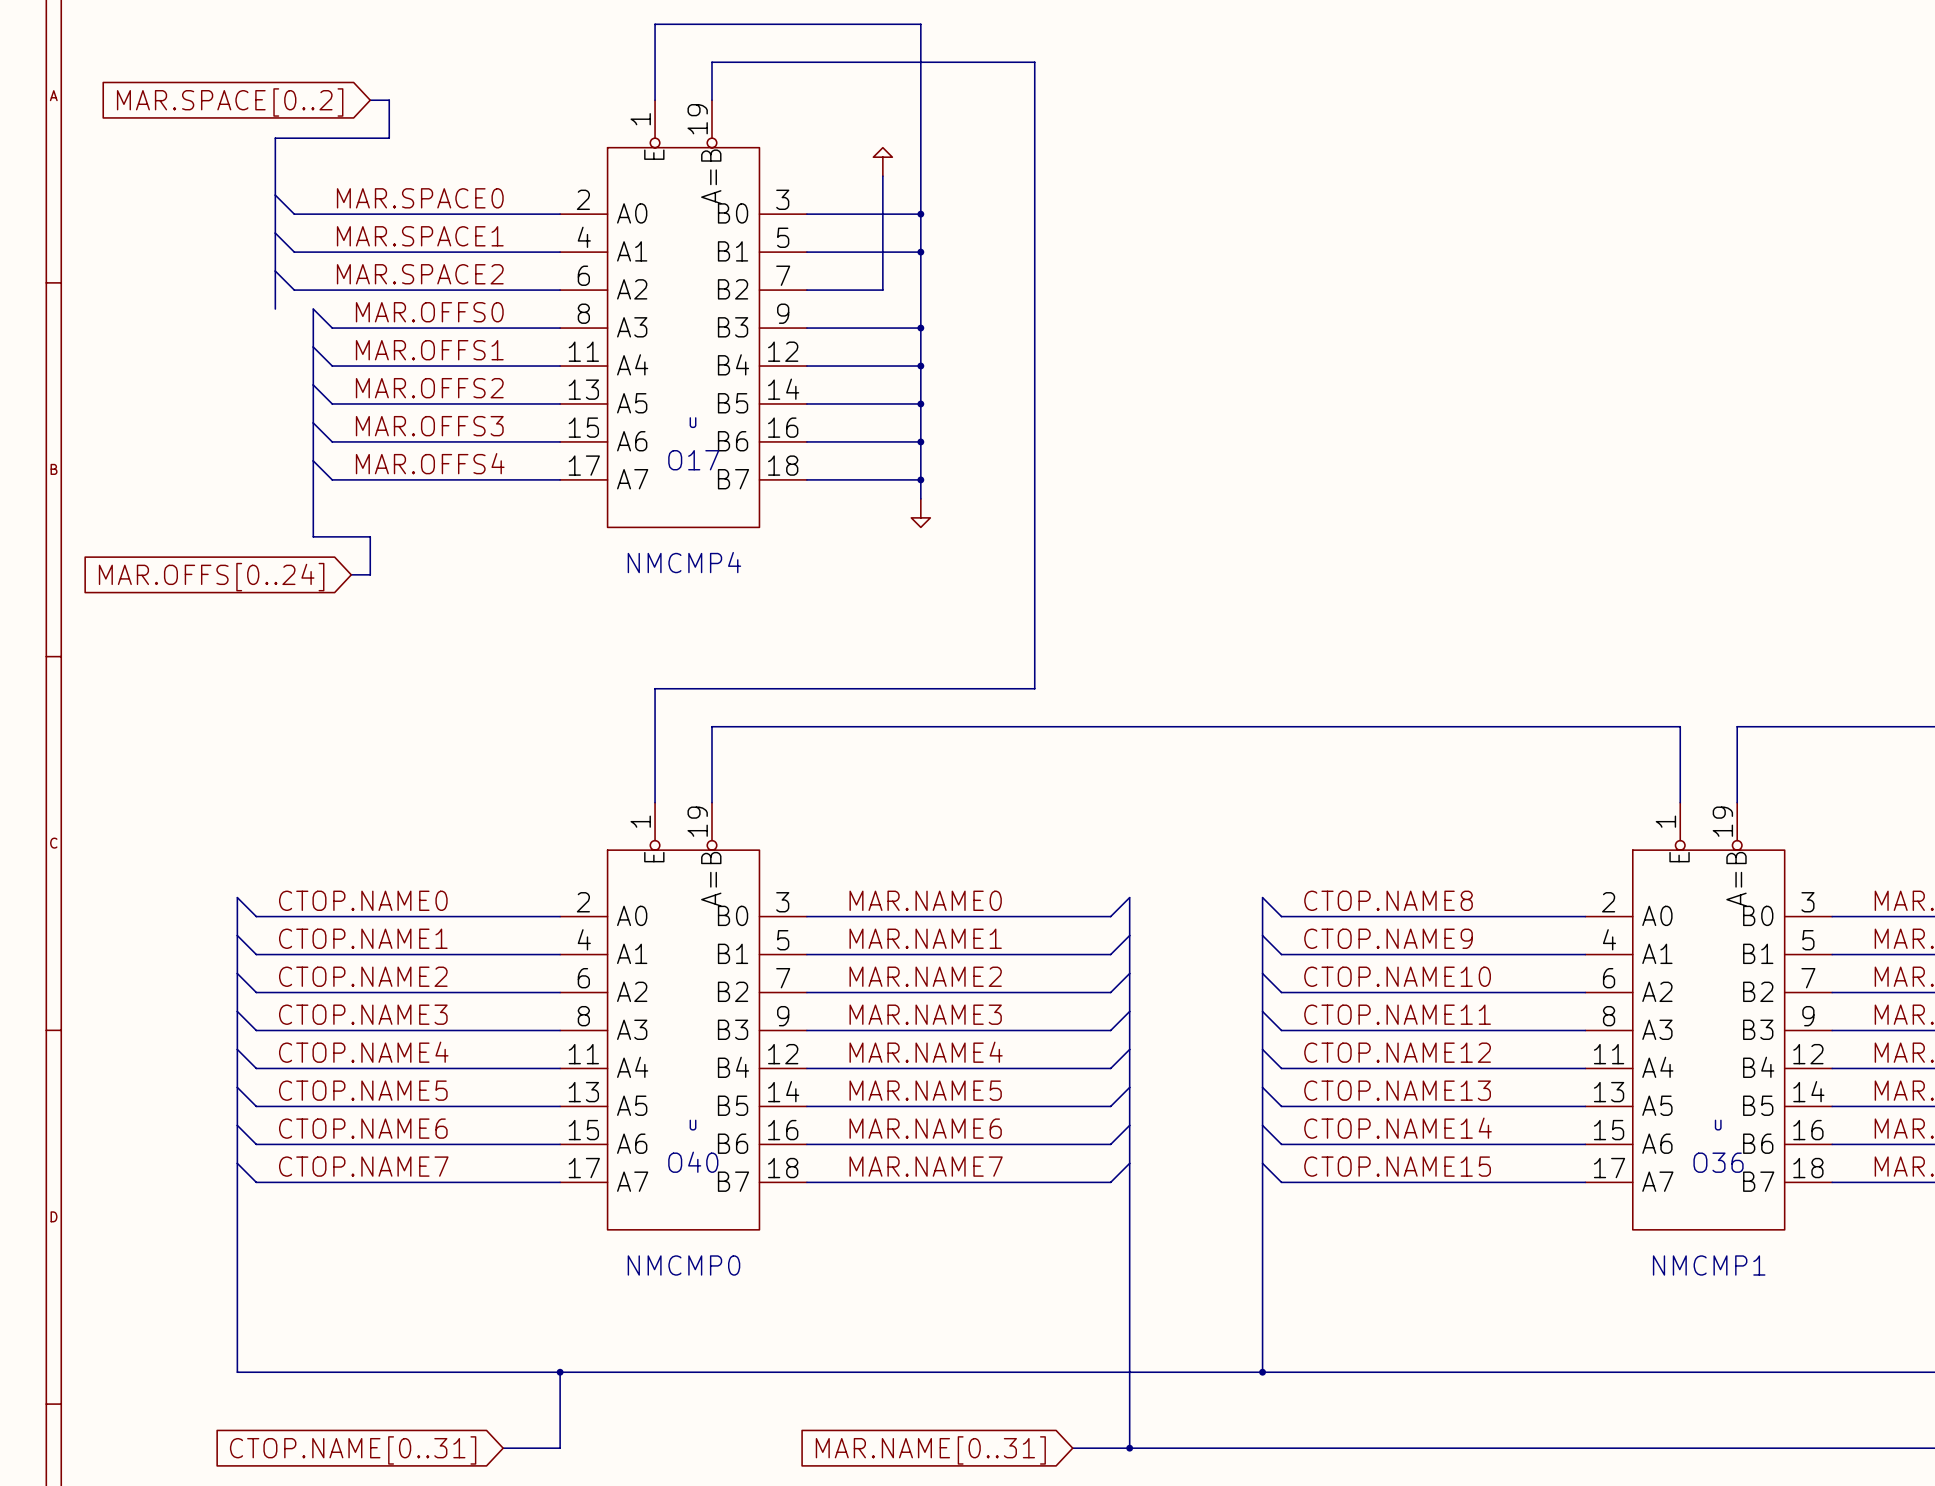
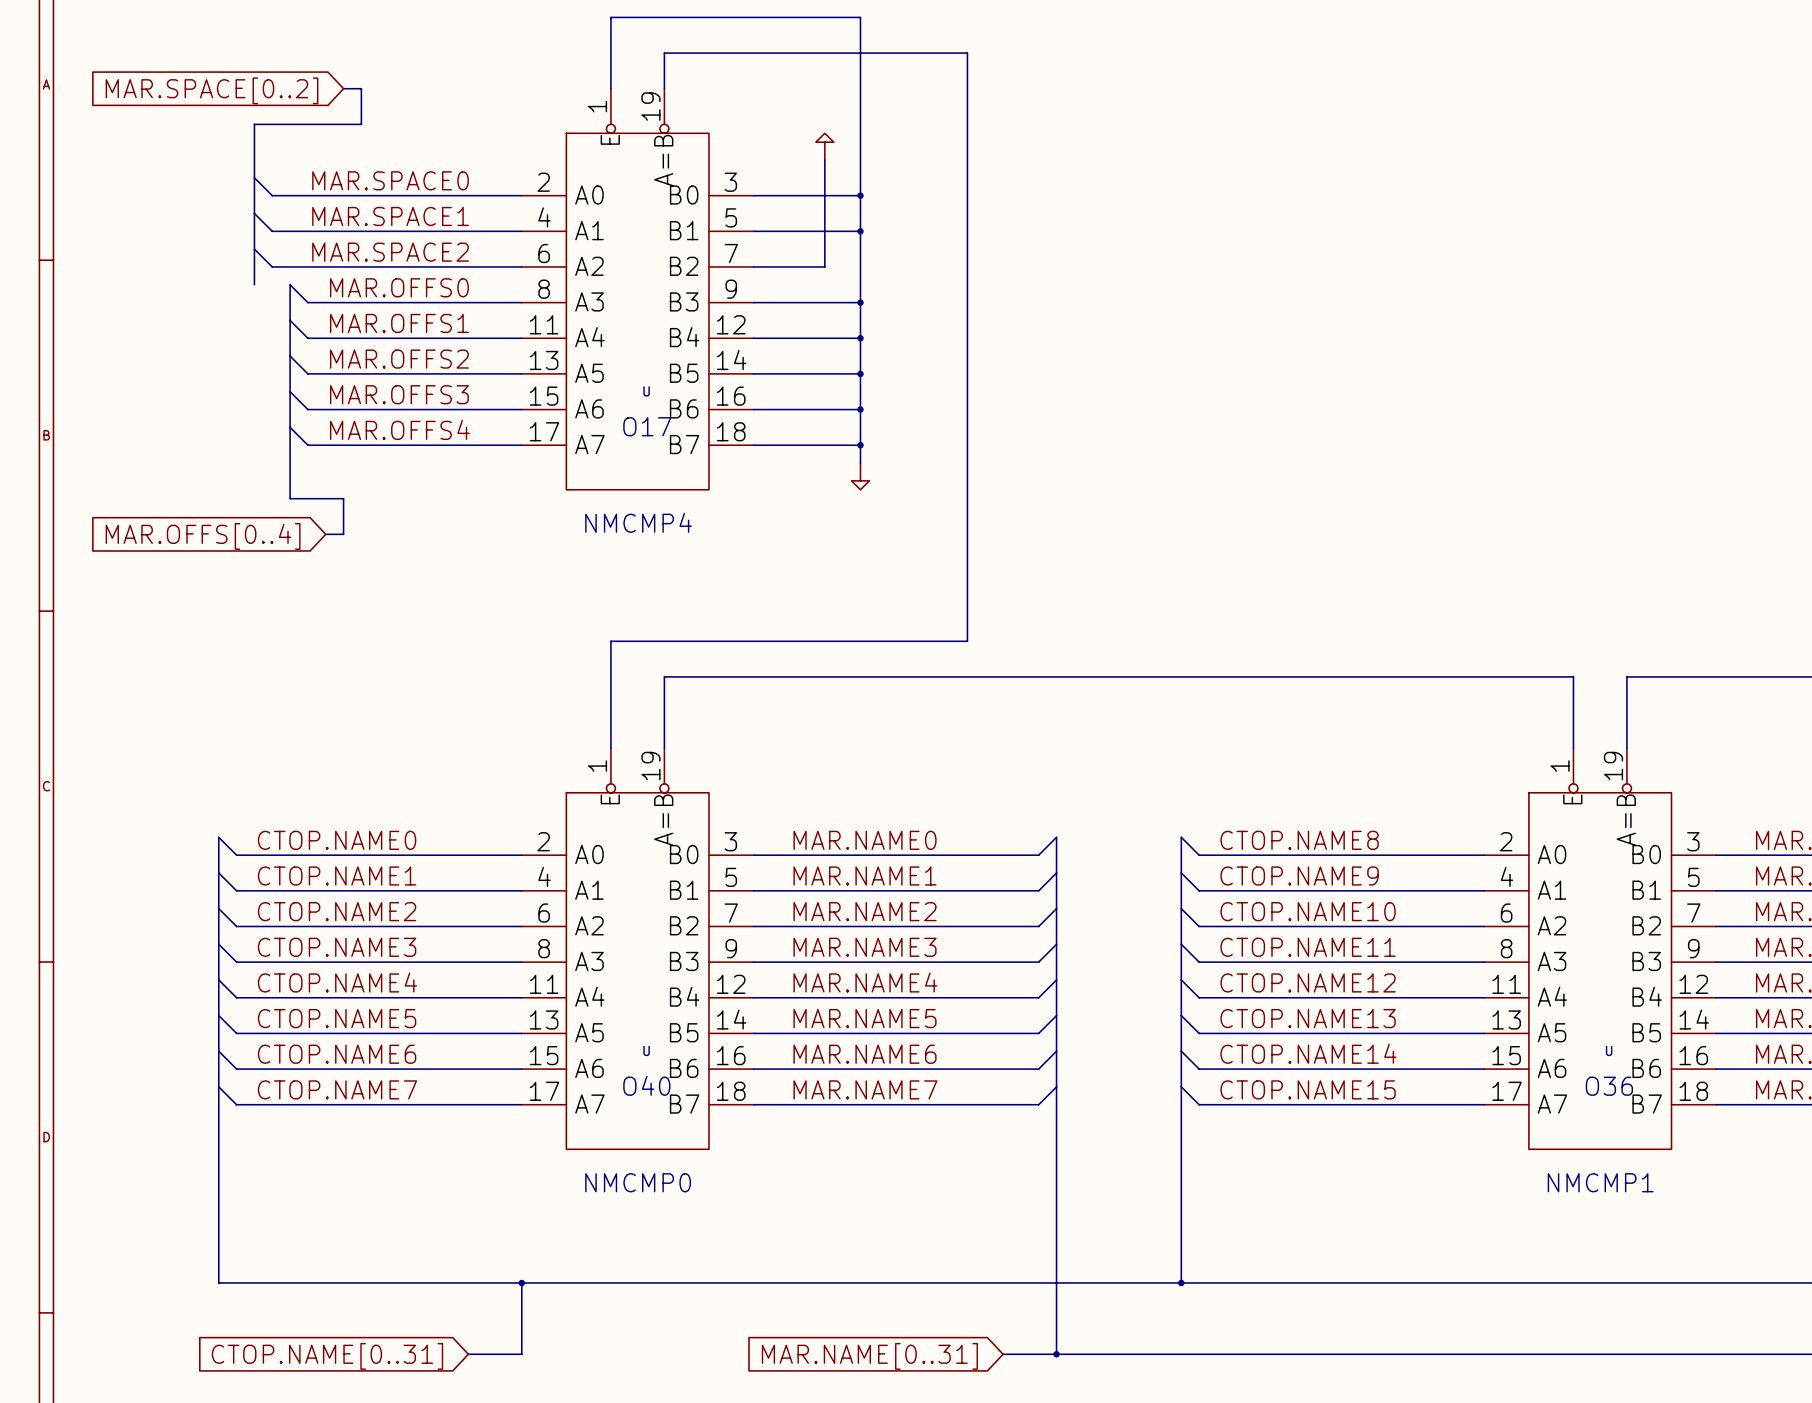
global label: MAR.OFFS[0..24] (211, 577) -> MAR.OFFS[0..4] (203, 536)

